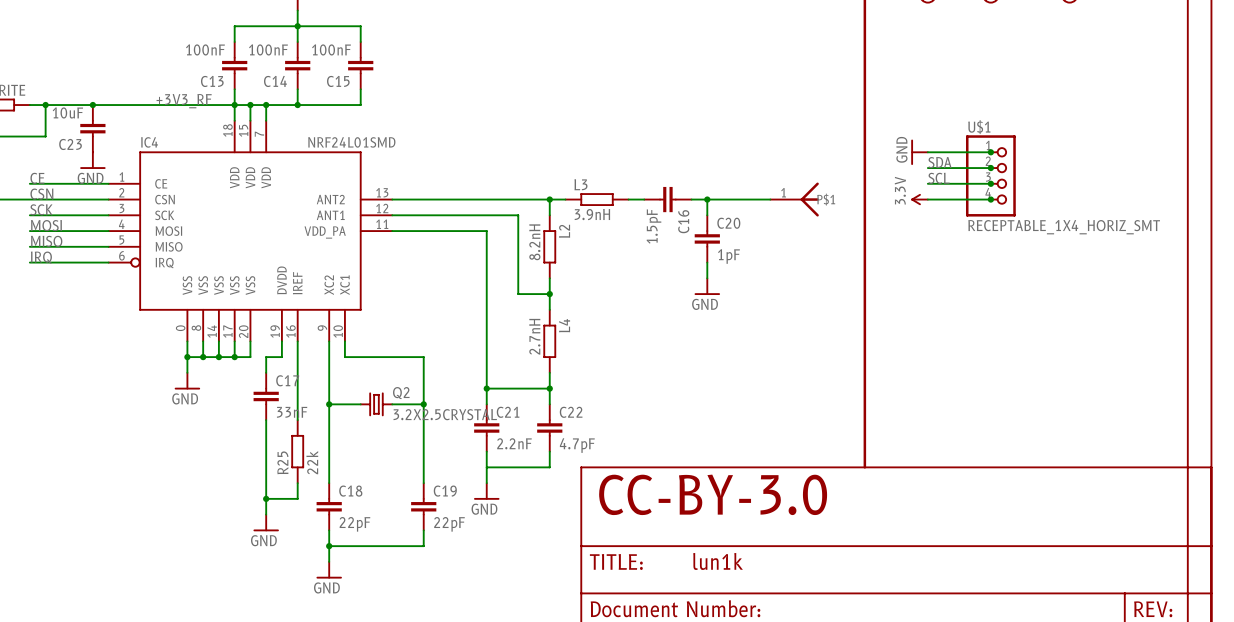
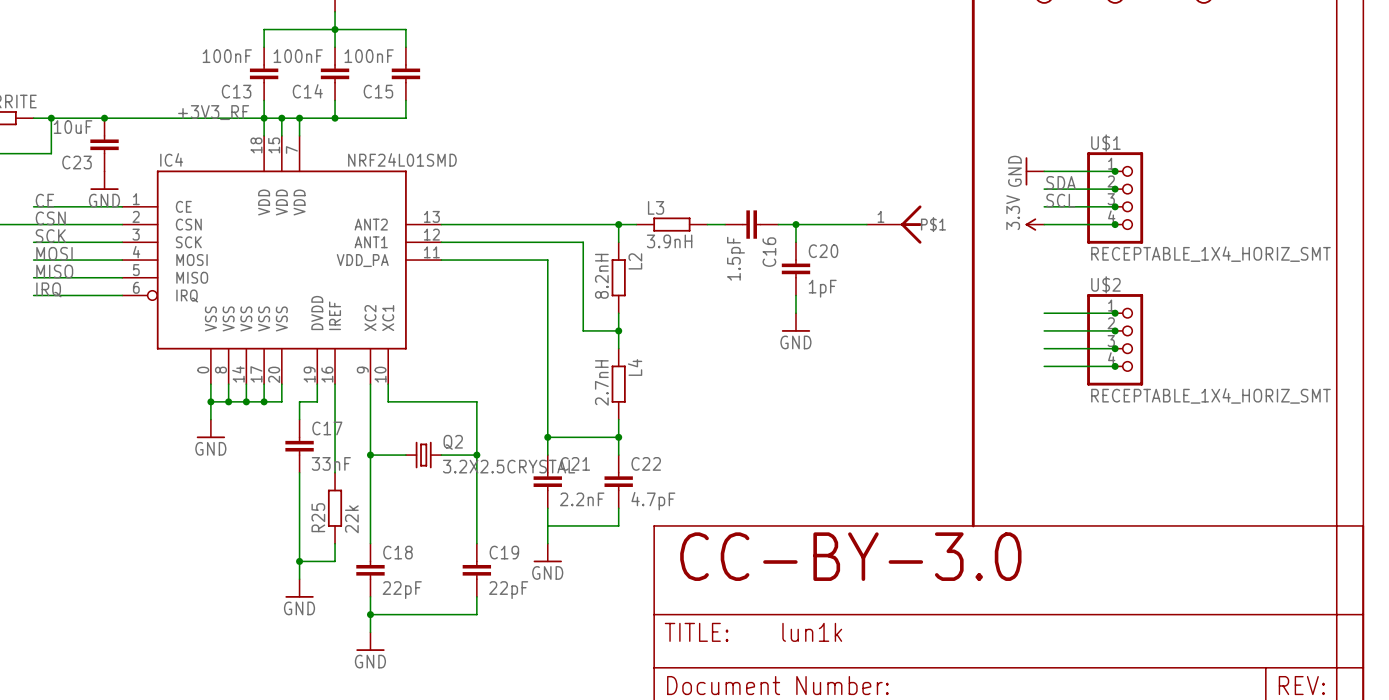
wire: none -> (1044, 313) (1115, 313)
junction: none -> (1115, 313)
wire: none -> (1044, 330) (1115, 330)
junction: none -> (1115, 330)
U$2: none -> RECEPTABLE_1X4_HORIZ_SMT (1115, 339)
wire: none -> (1044, 348) (1115, 348)
junction: none -> (1115, 348)
wire: none -> (1044, 366) (1115, 366)
junction: none -> (1115, 366)

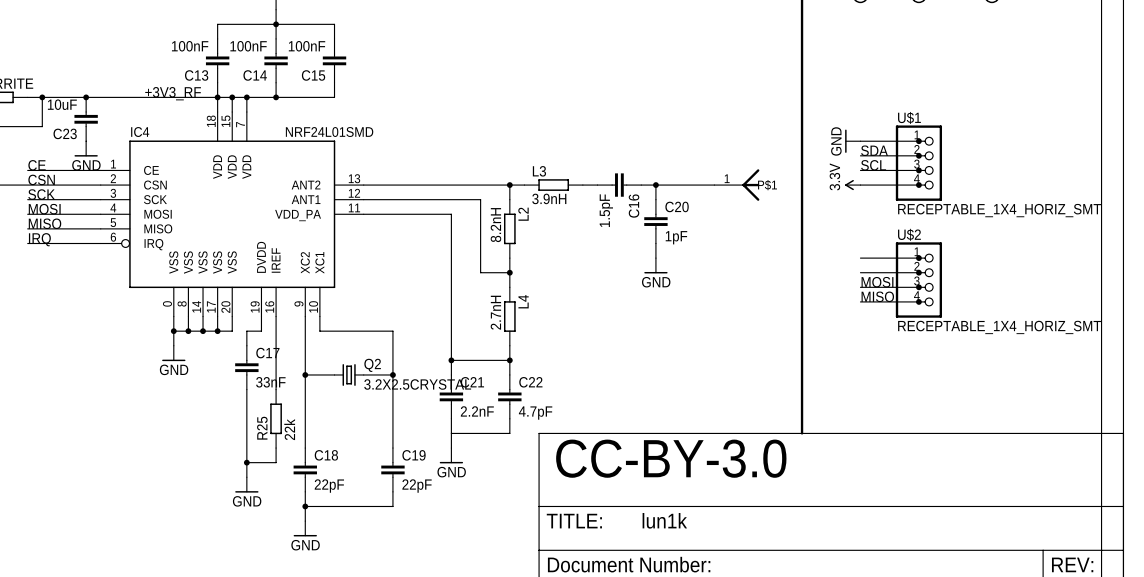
label: none -> MOSI (877, 282)
label: none -> MISO (877, 296)

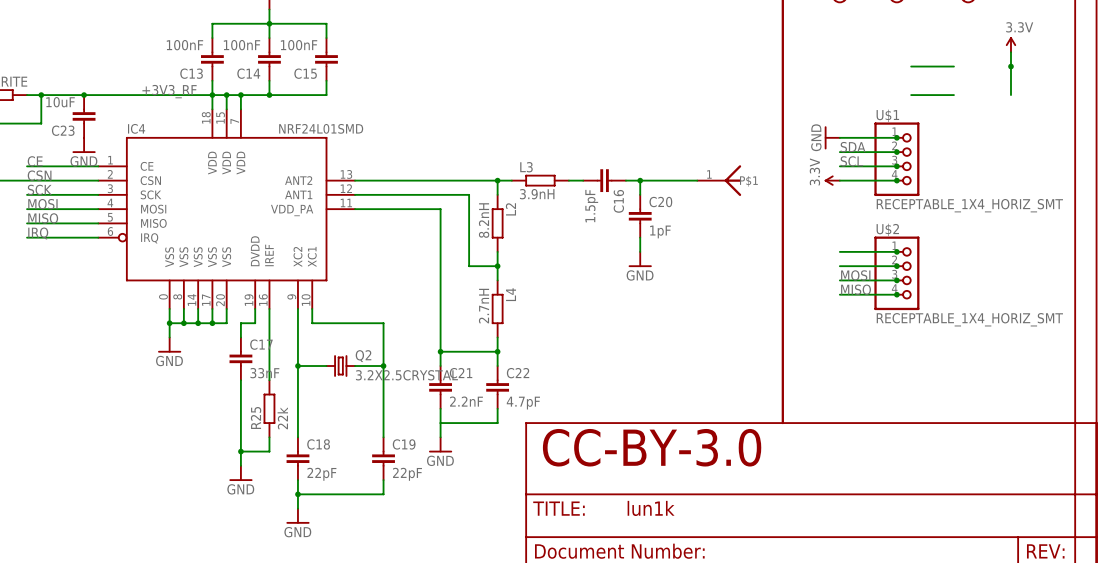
power symbol: none -> 3.3V (1010, 44)
wire: none -> (1010, 52) (1010, 95)
wire: none -> (911, 66) (953, 66)
junction: none -> (1010, 66)
wire: none -> (911, 95) (953, 95)

